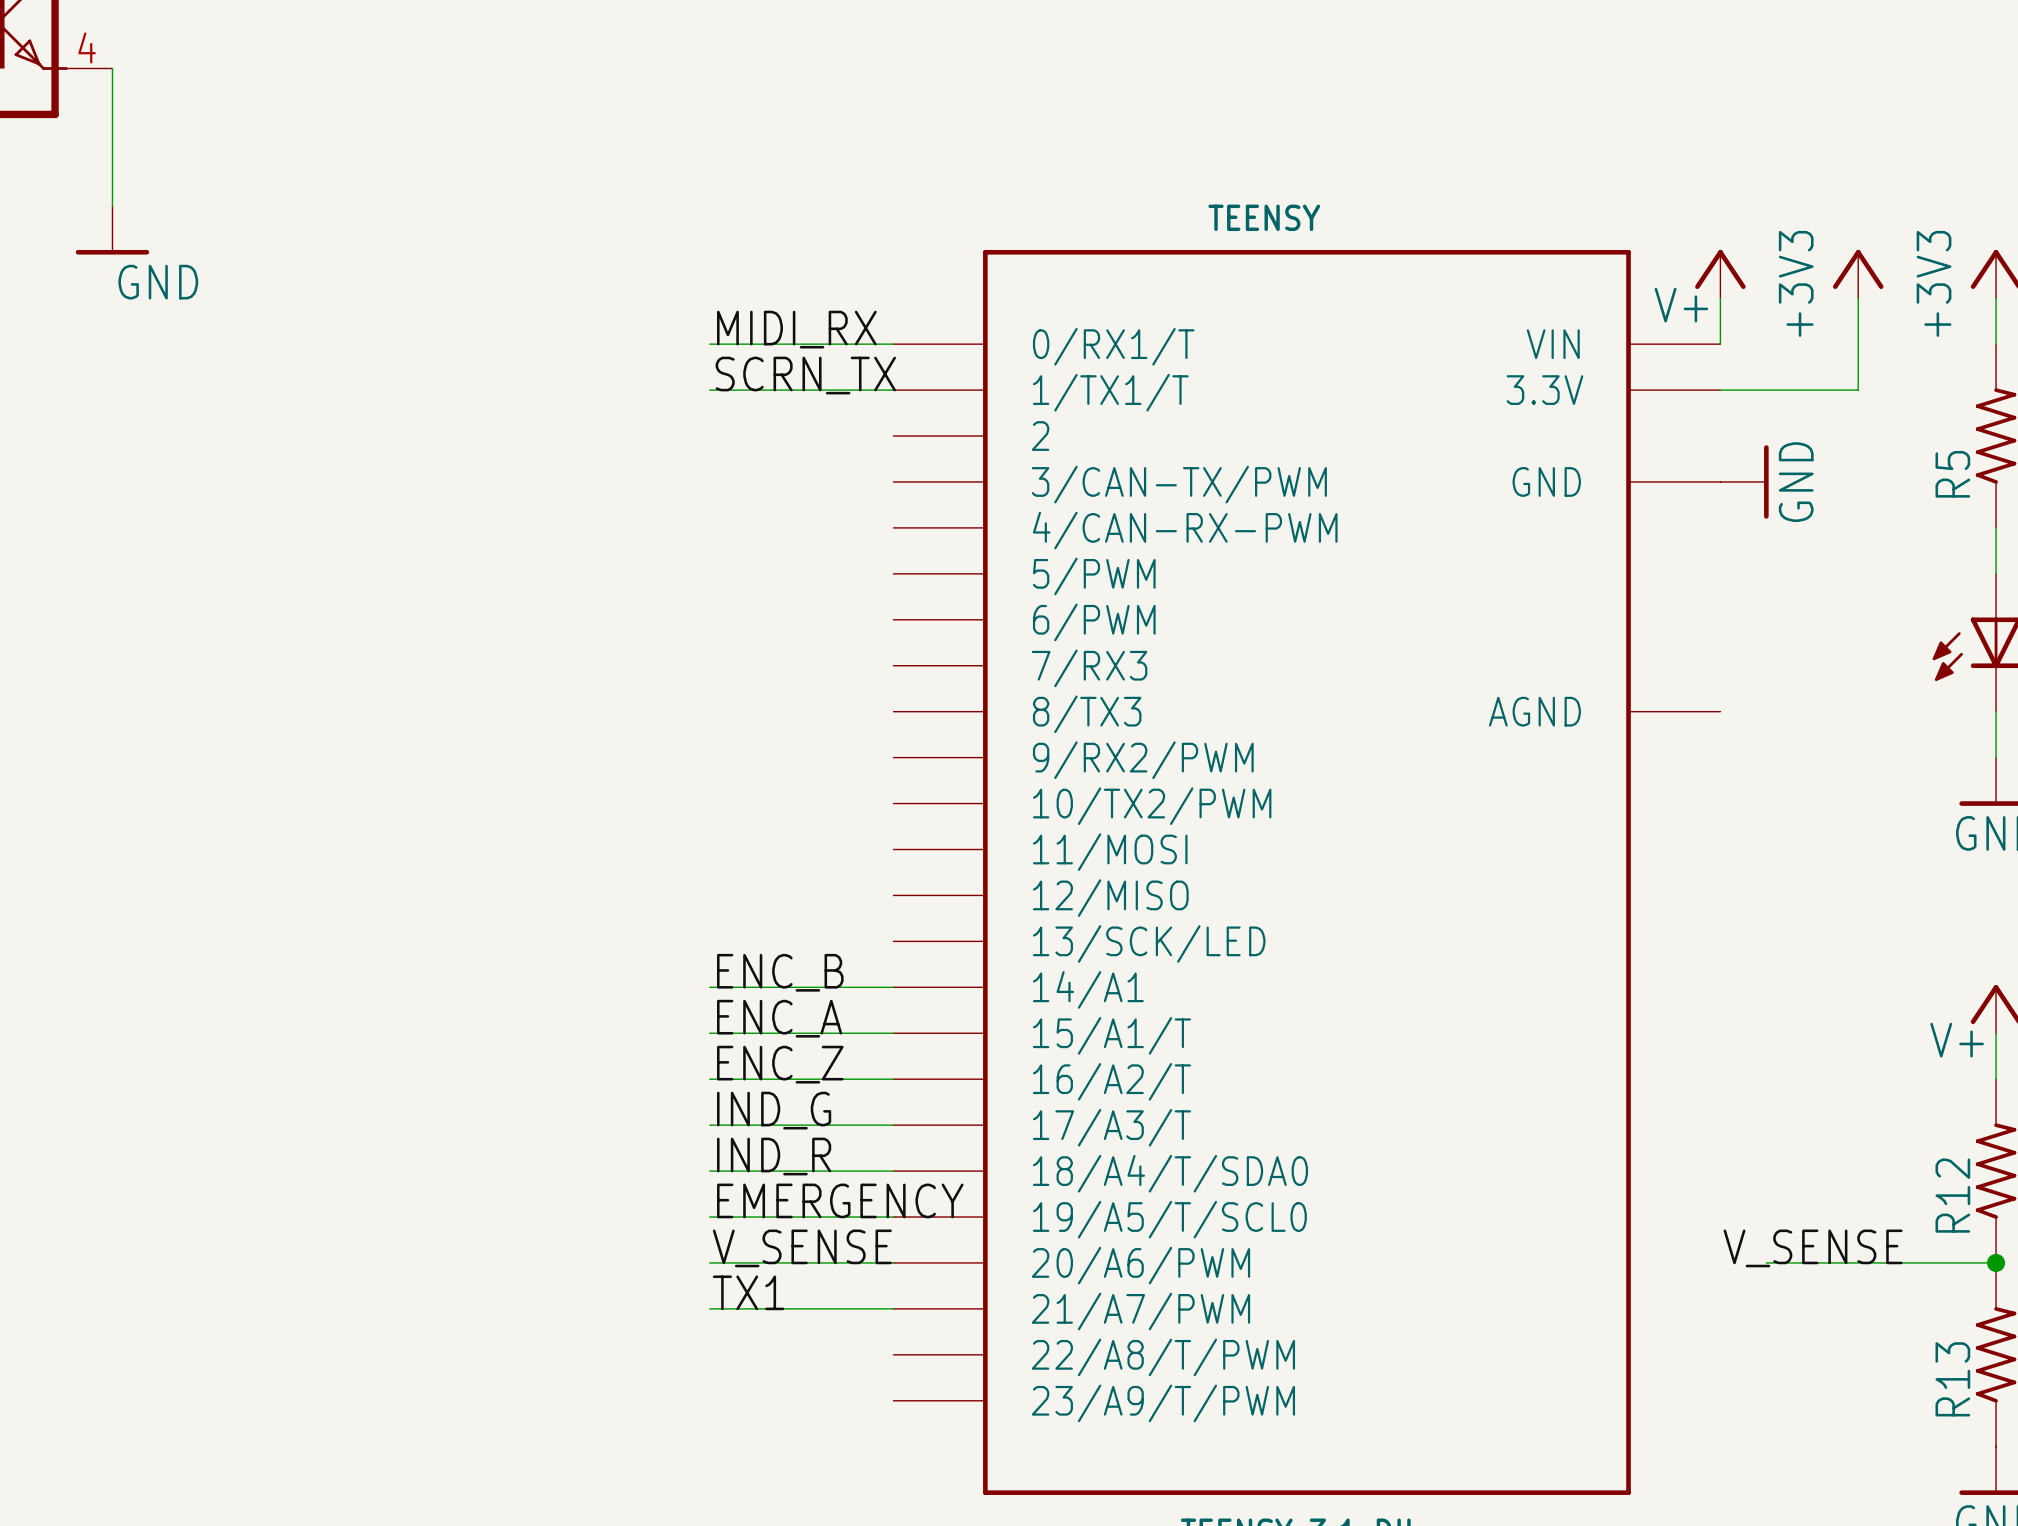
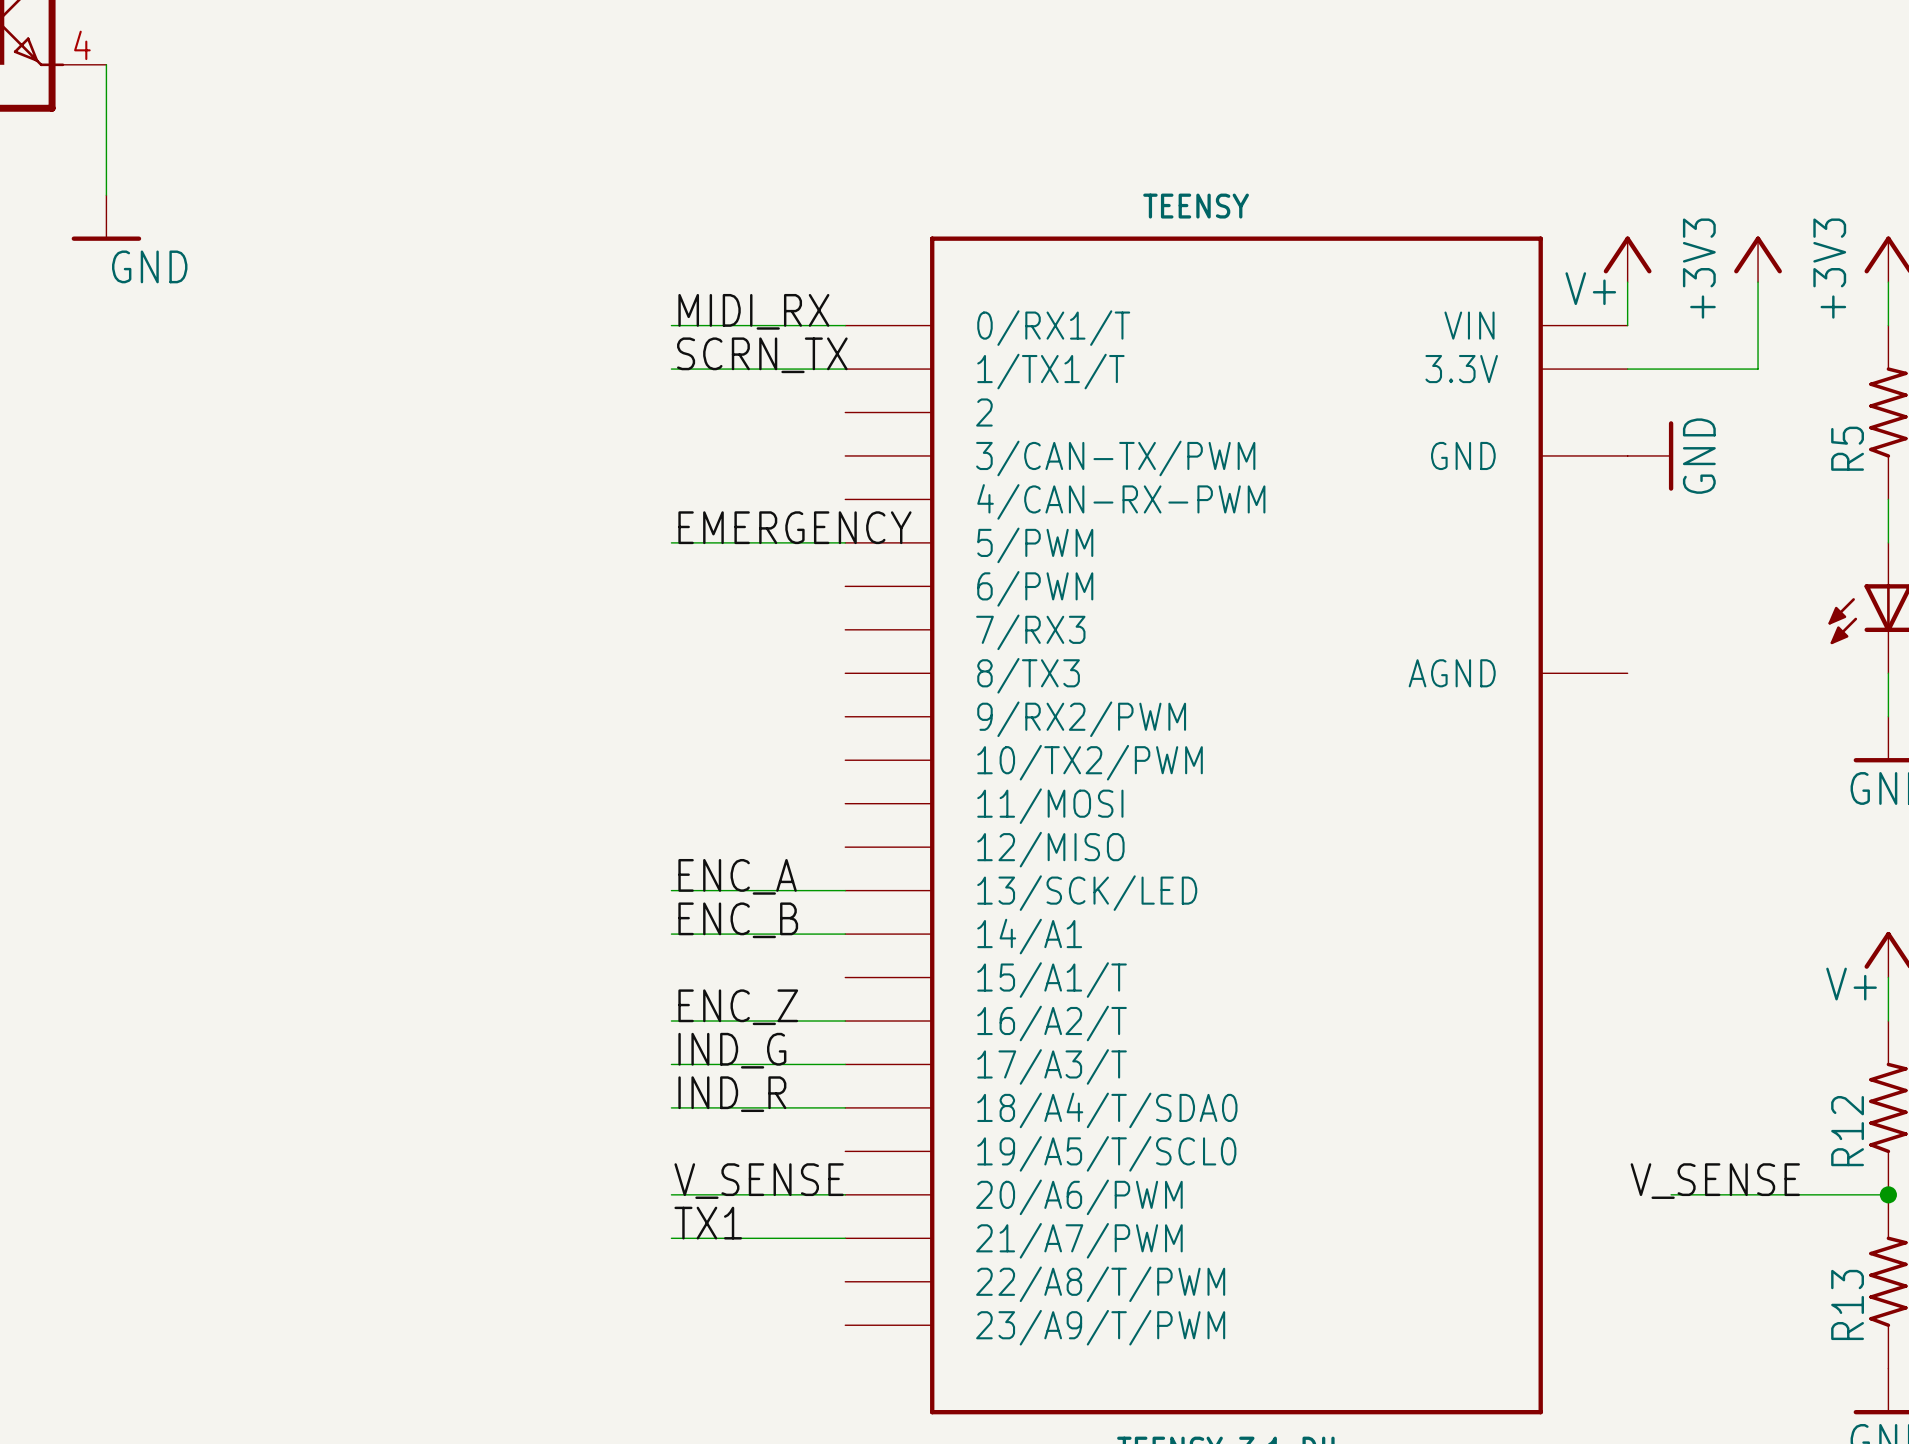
label: none -> EMERGENCY (794, 527)
wire: none -> (671, 542) (845, 542)
label position: ENC_A (779, 1018) -> ENC_A (737, 876)
wire: (709, 1033) (893, 1033) -> (671, 890) (845, 890)
label: EMERGENCY (840, 1200) -> none
wire: (709, 1217) (893, 1217) -> none

